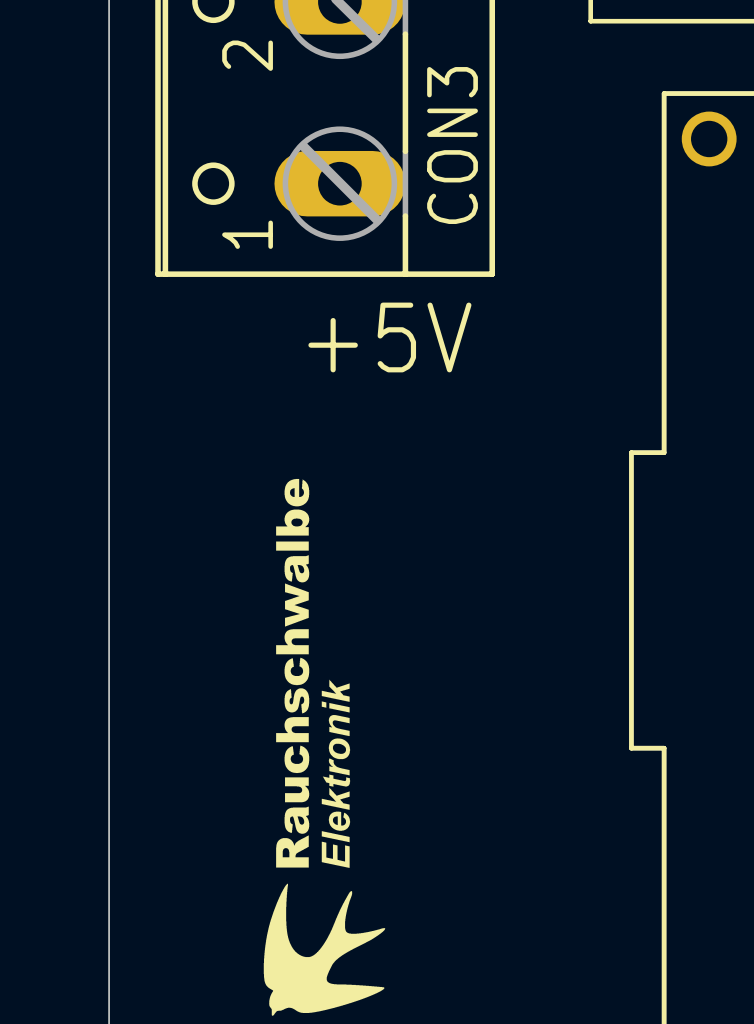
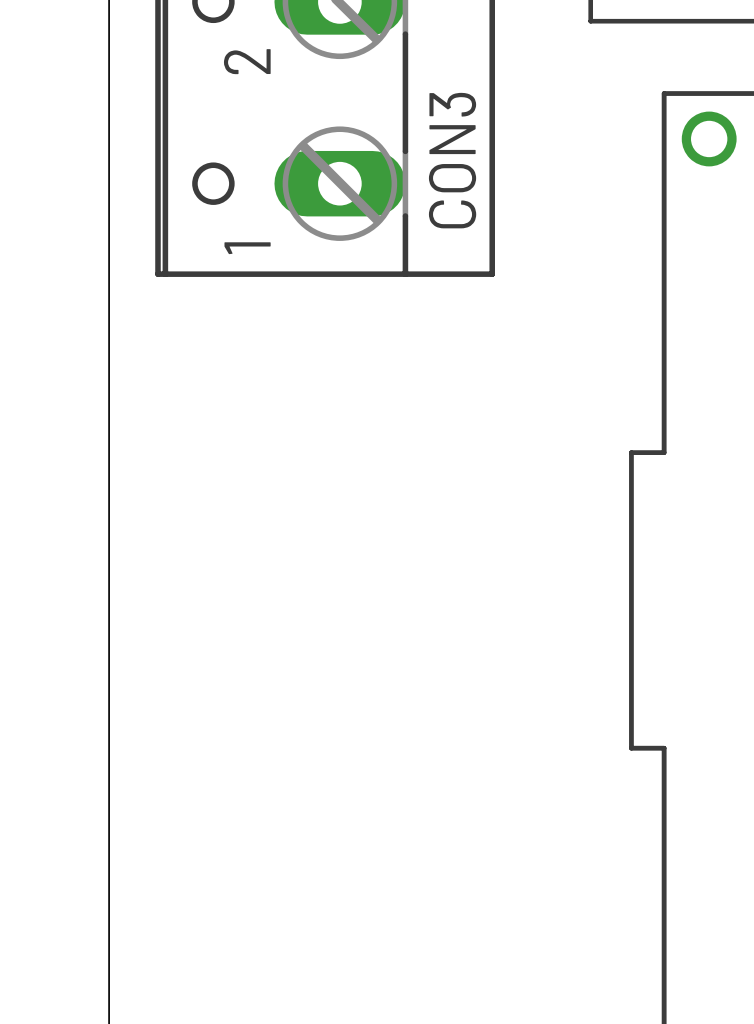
text: +5V (389, 337) -> none
drawing: [263, 478, 386, 1016] -> none

